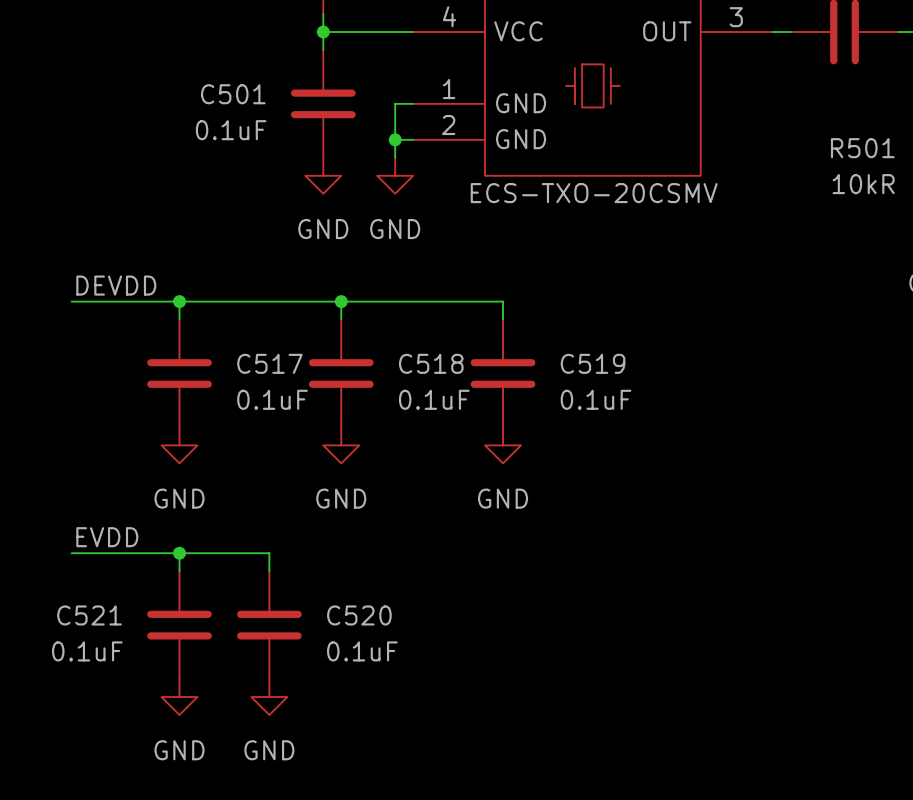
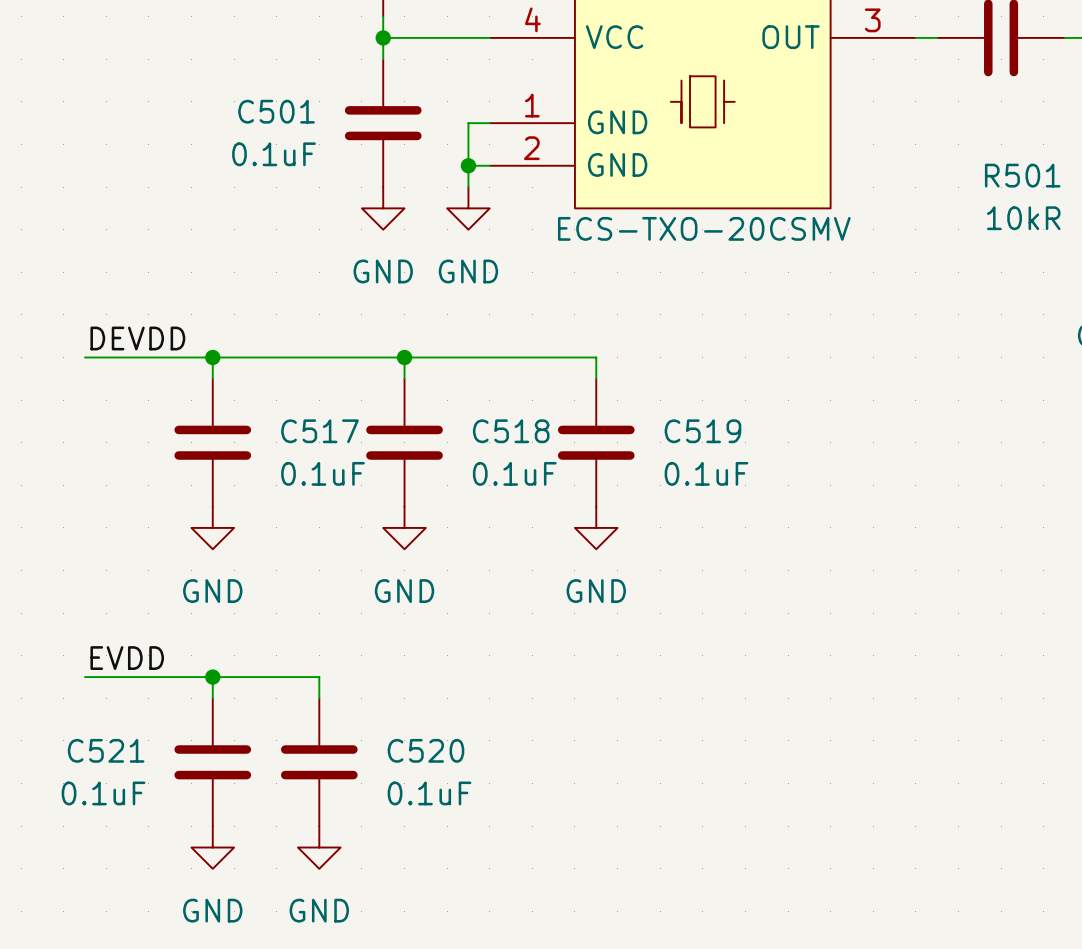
label position: EVDD (107, 537) -> EVDD (127, 658)
wire: (71, 553) (269, 553) (269, 571) -> (84, 677) (319, 677) (319, 698)
junction position: (179, 553) -> (212, 677)
C521 position: (179, 625) -> (212, 762)
C520 position: (269, 625) -> (319, 762)
power symbol position: GND (179, 697) -> GND (212, 847)
power symbol position: GND (269, 697) -> GND (319, 847)

